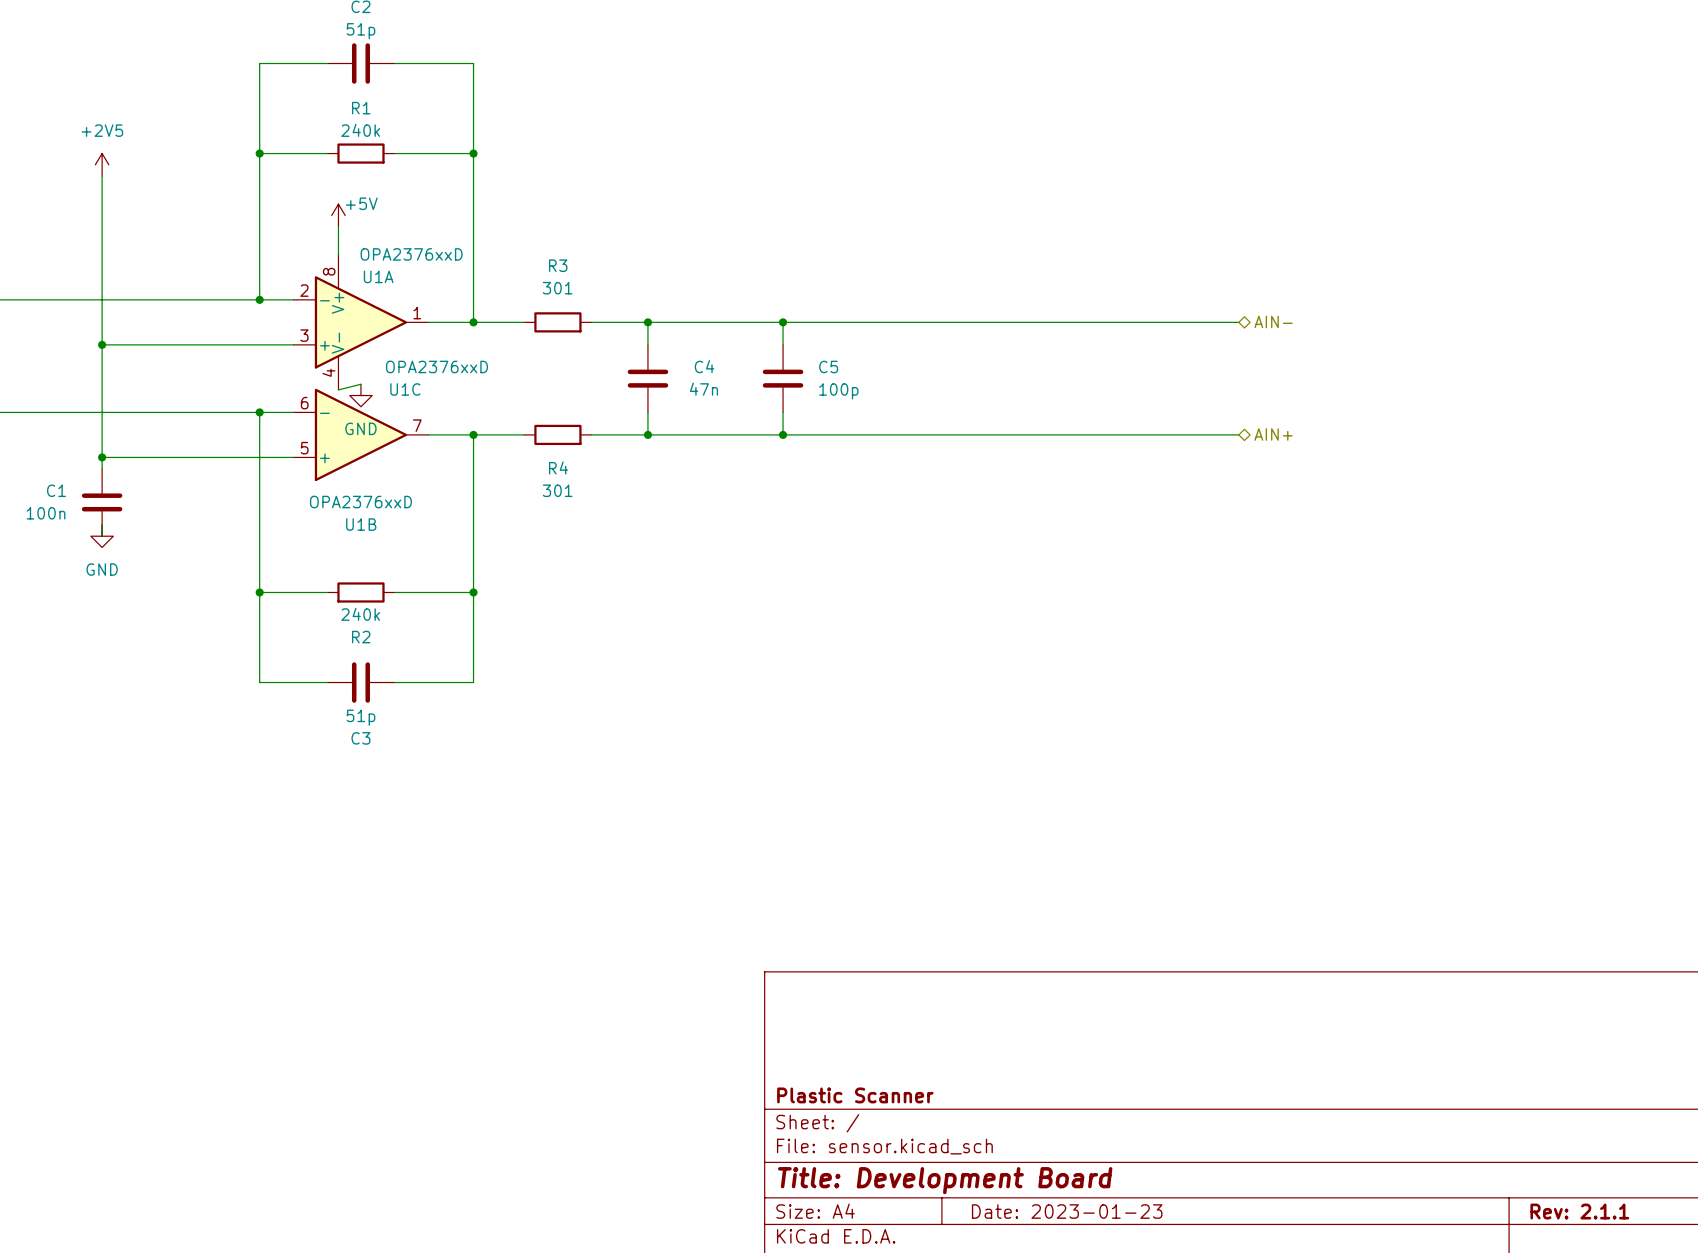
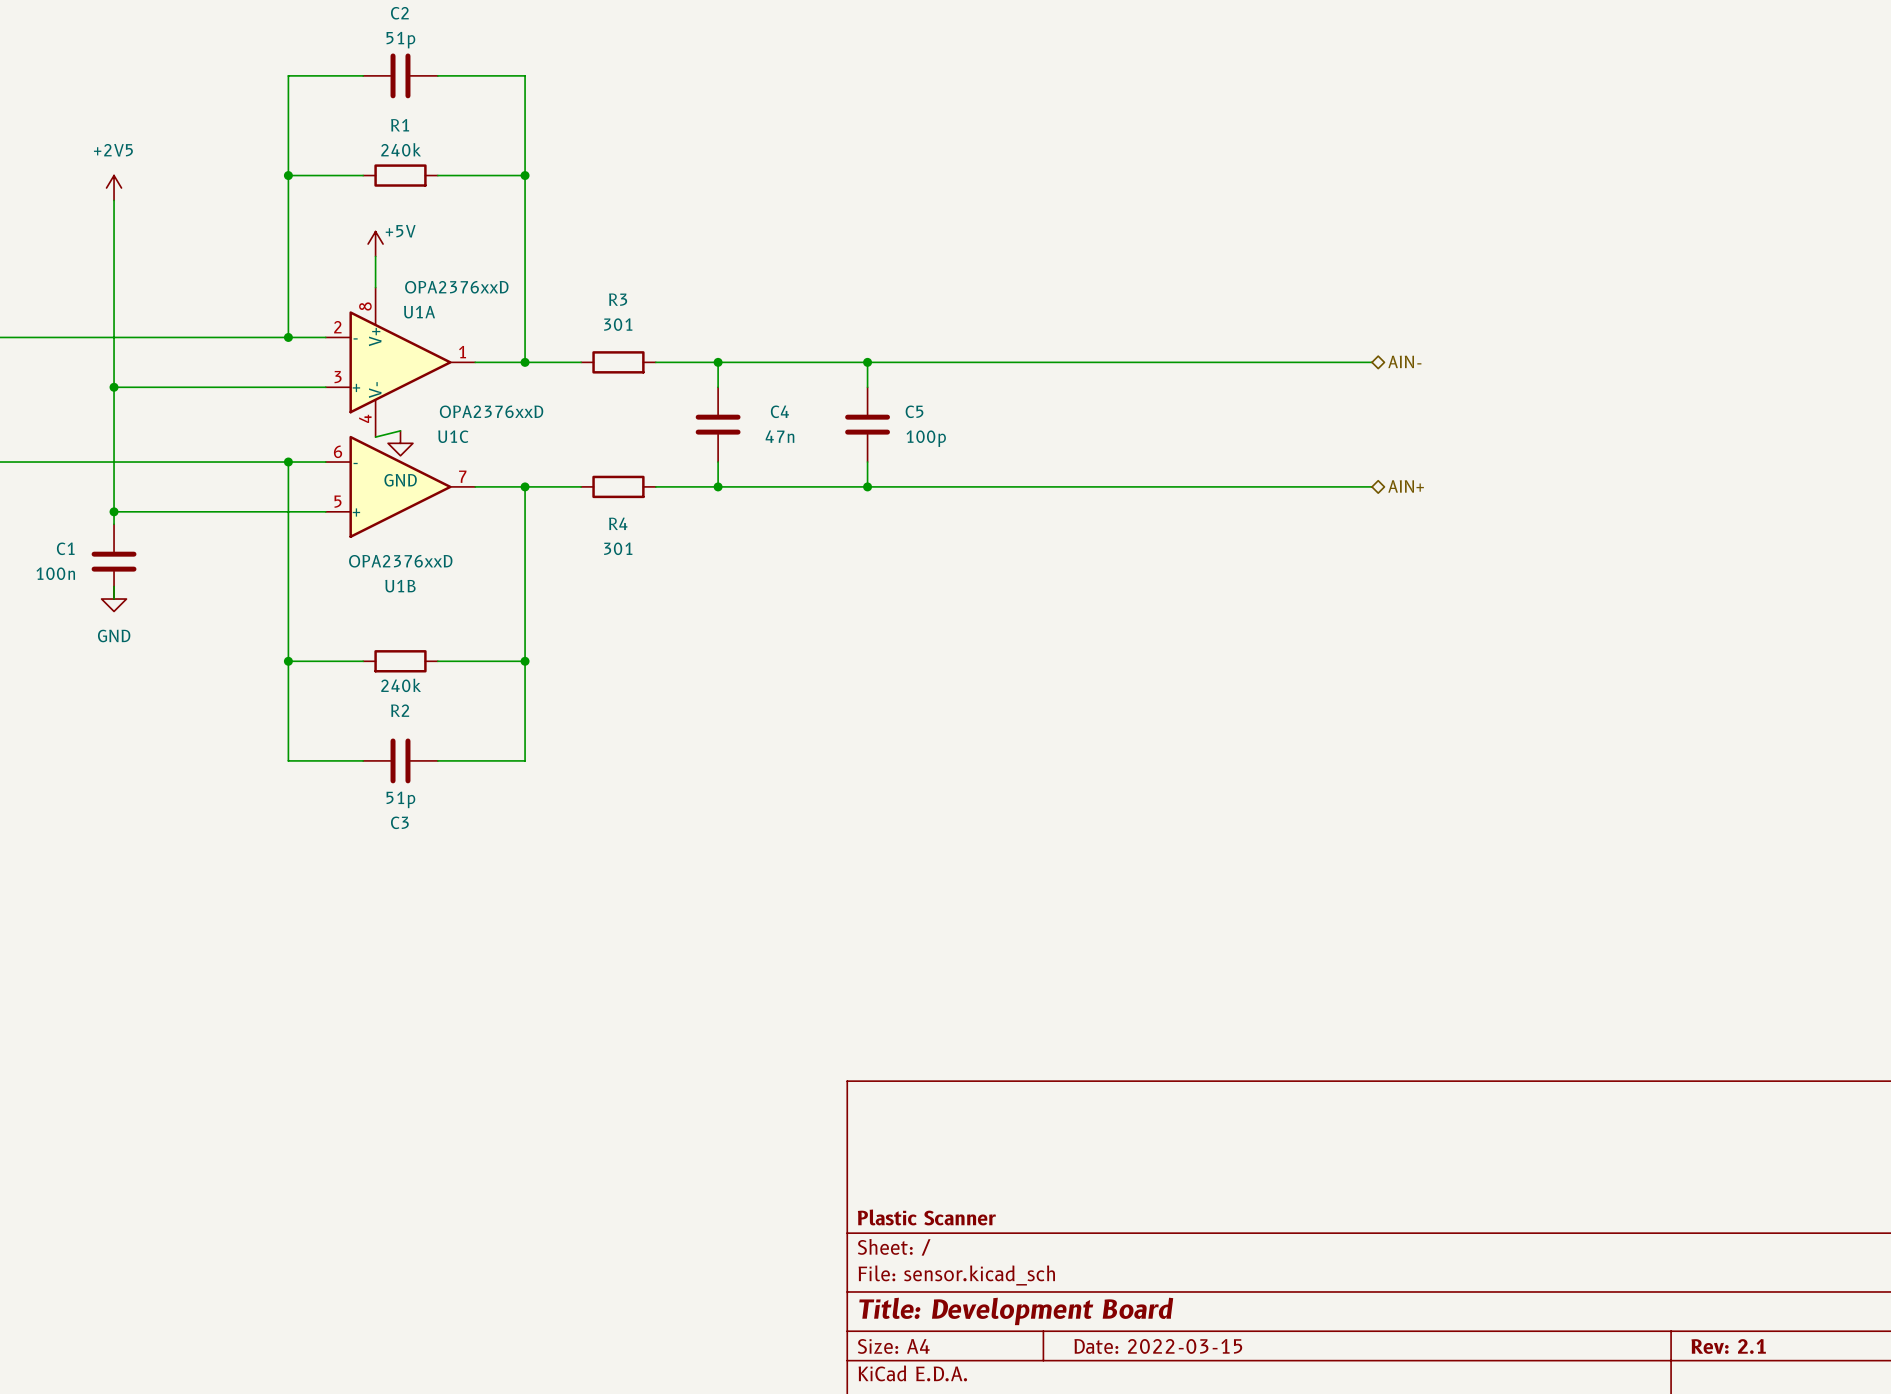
title block: Date: 2023-01-23 (1067, 1211) -> Date: 2022-03-15 (1158, 1346)
title block: Rev: 2.1.1 (1579, 1211) -> Rev: 2.1 (1728, 1346)

